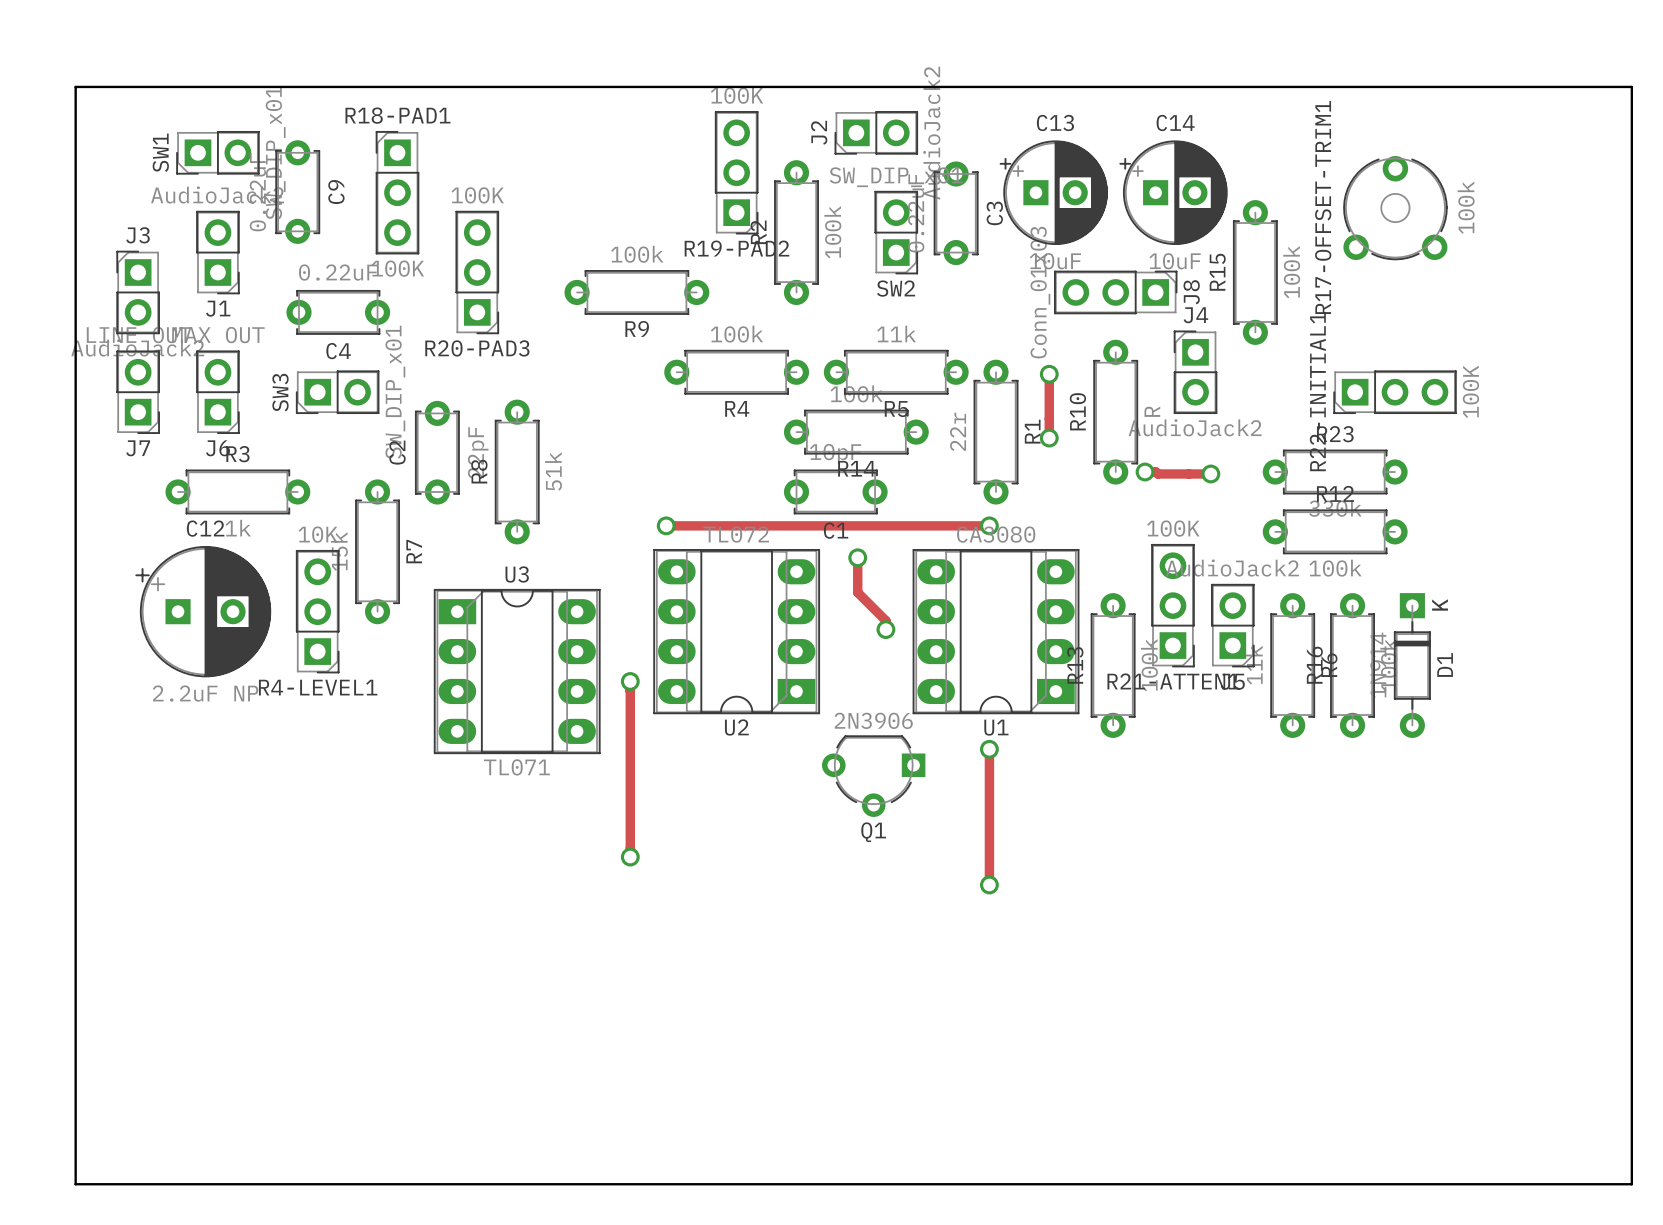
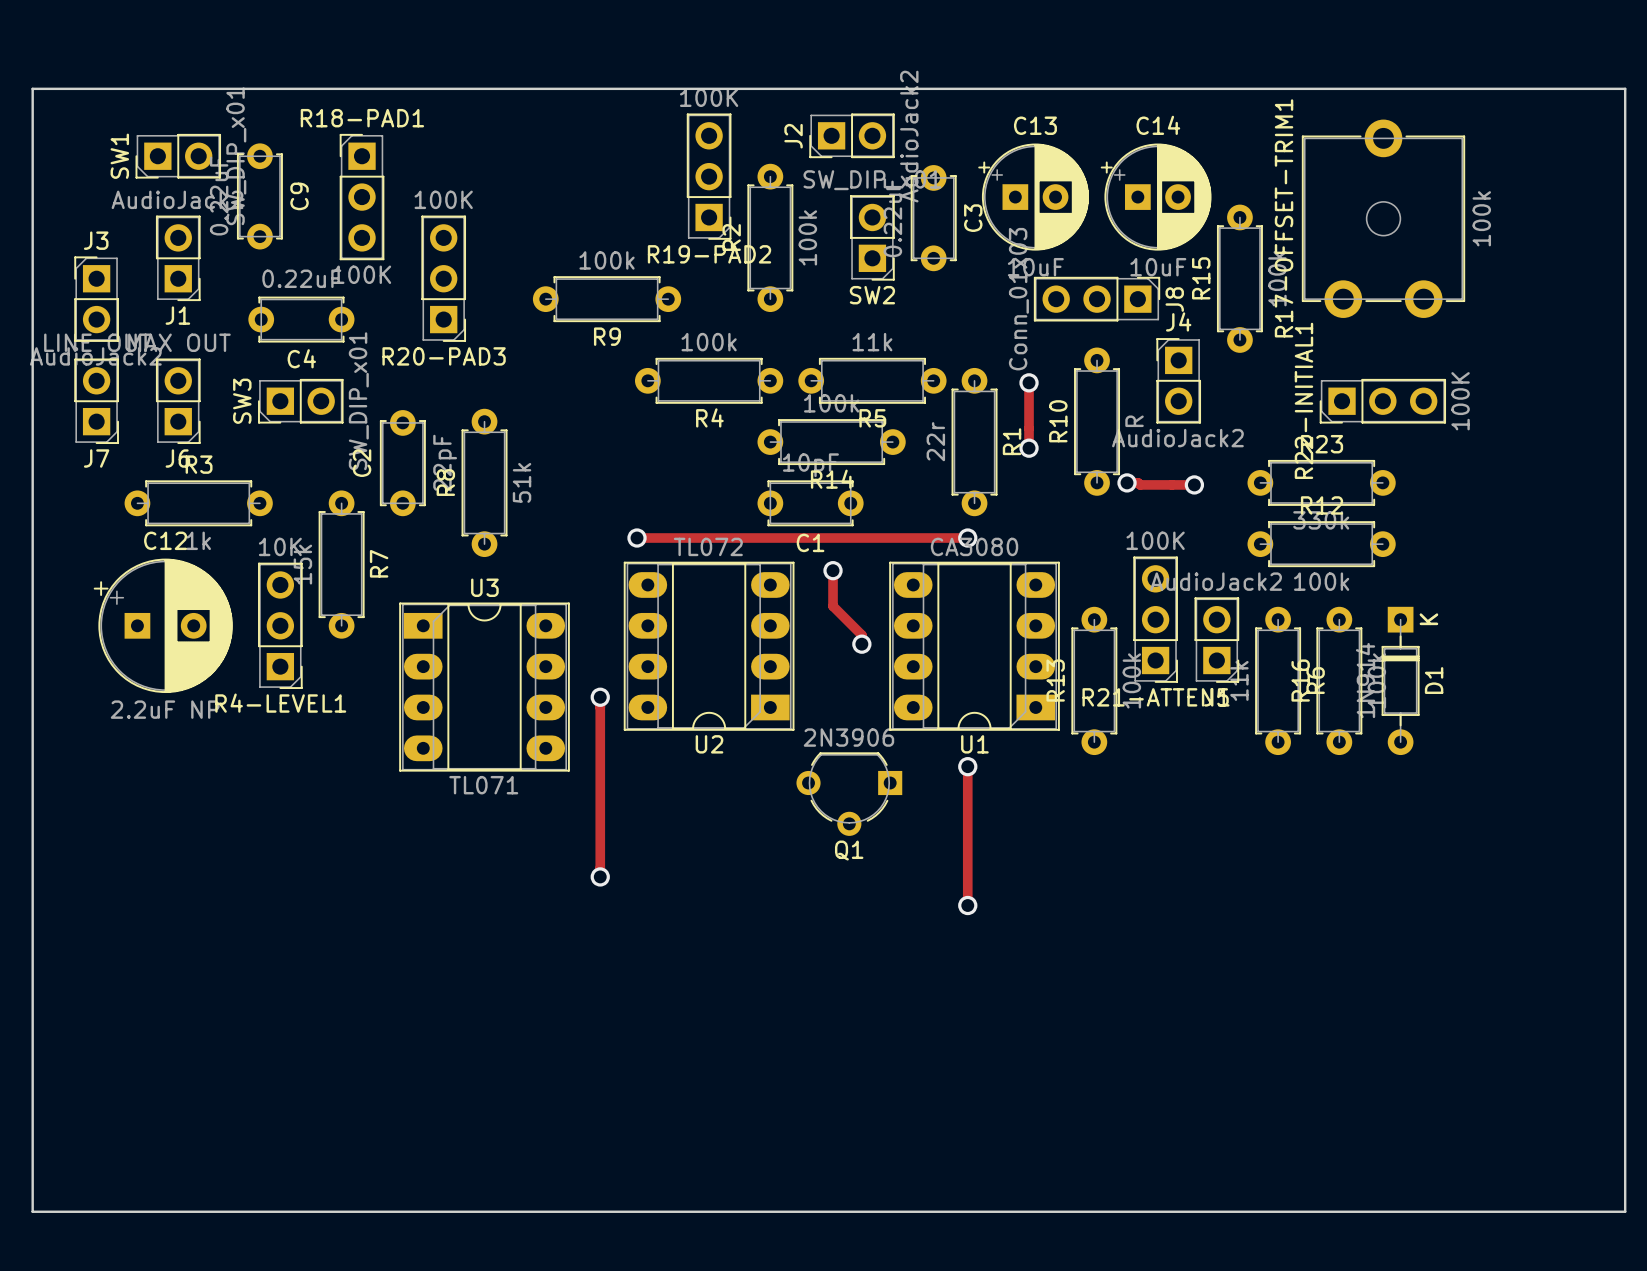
R17-OFFSET-TRIM1 footprint: [1343, 156, 1448, 261] -> [1301, 119, 1466, 318]

